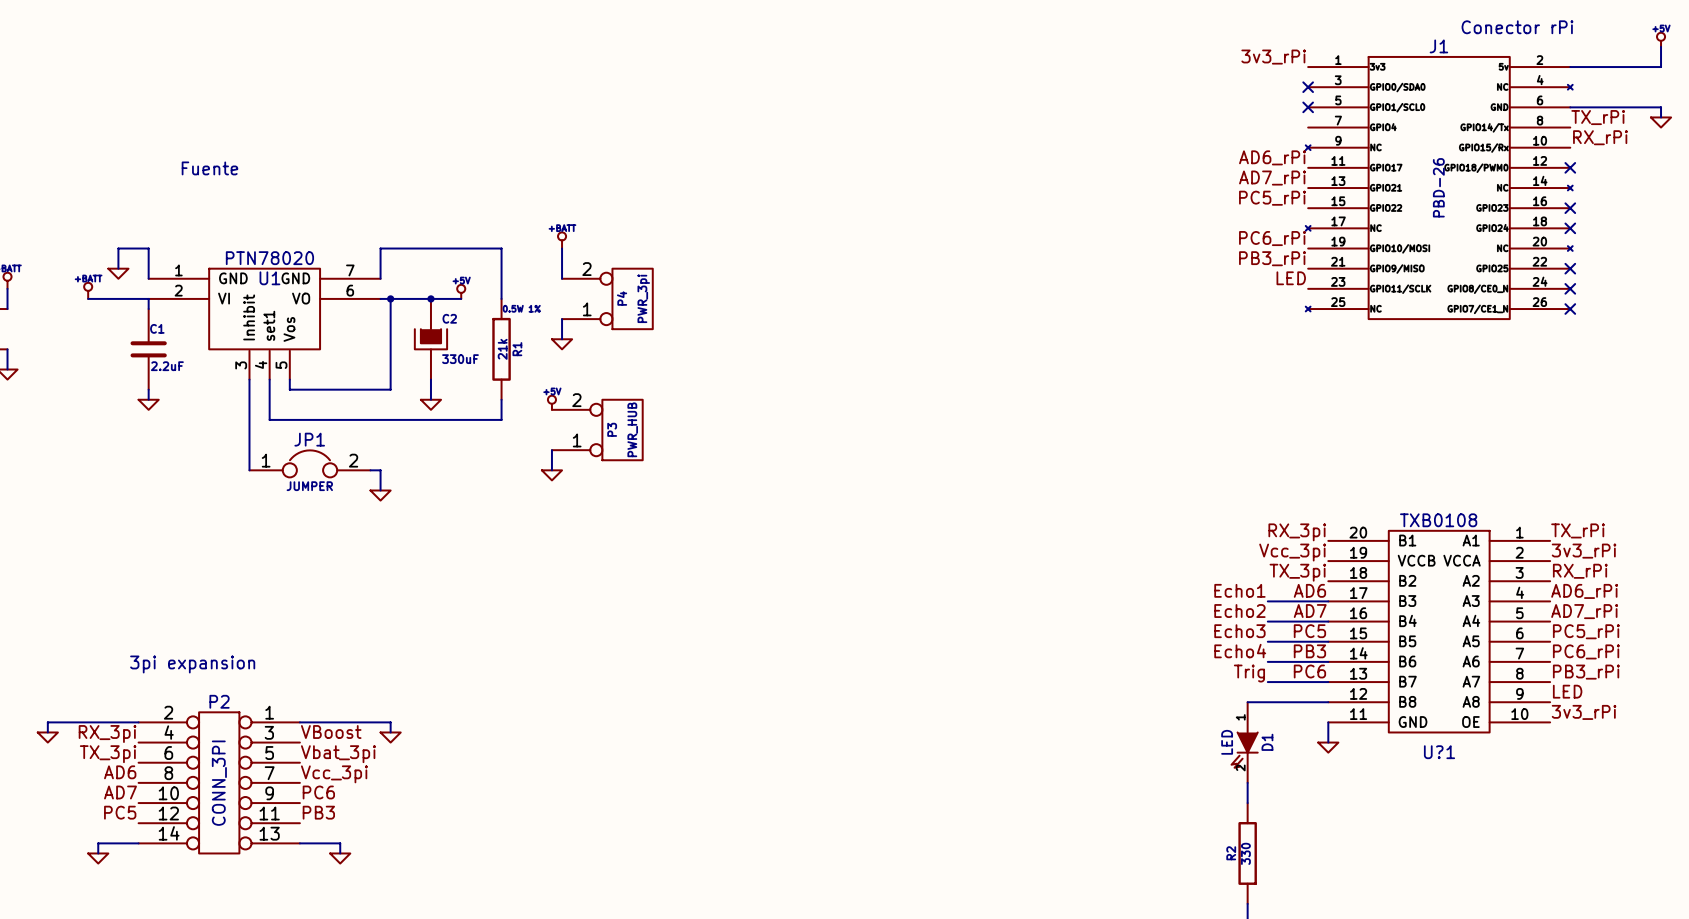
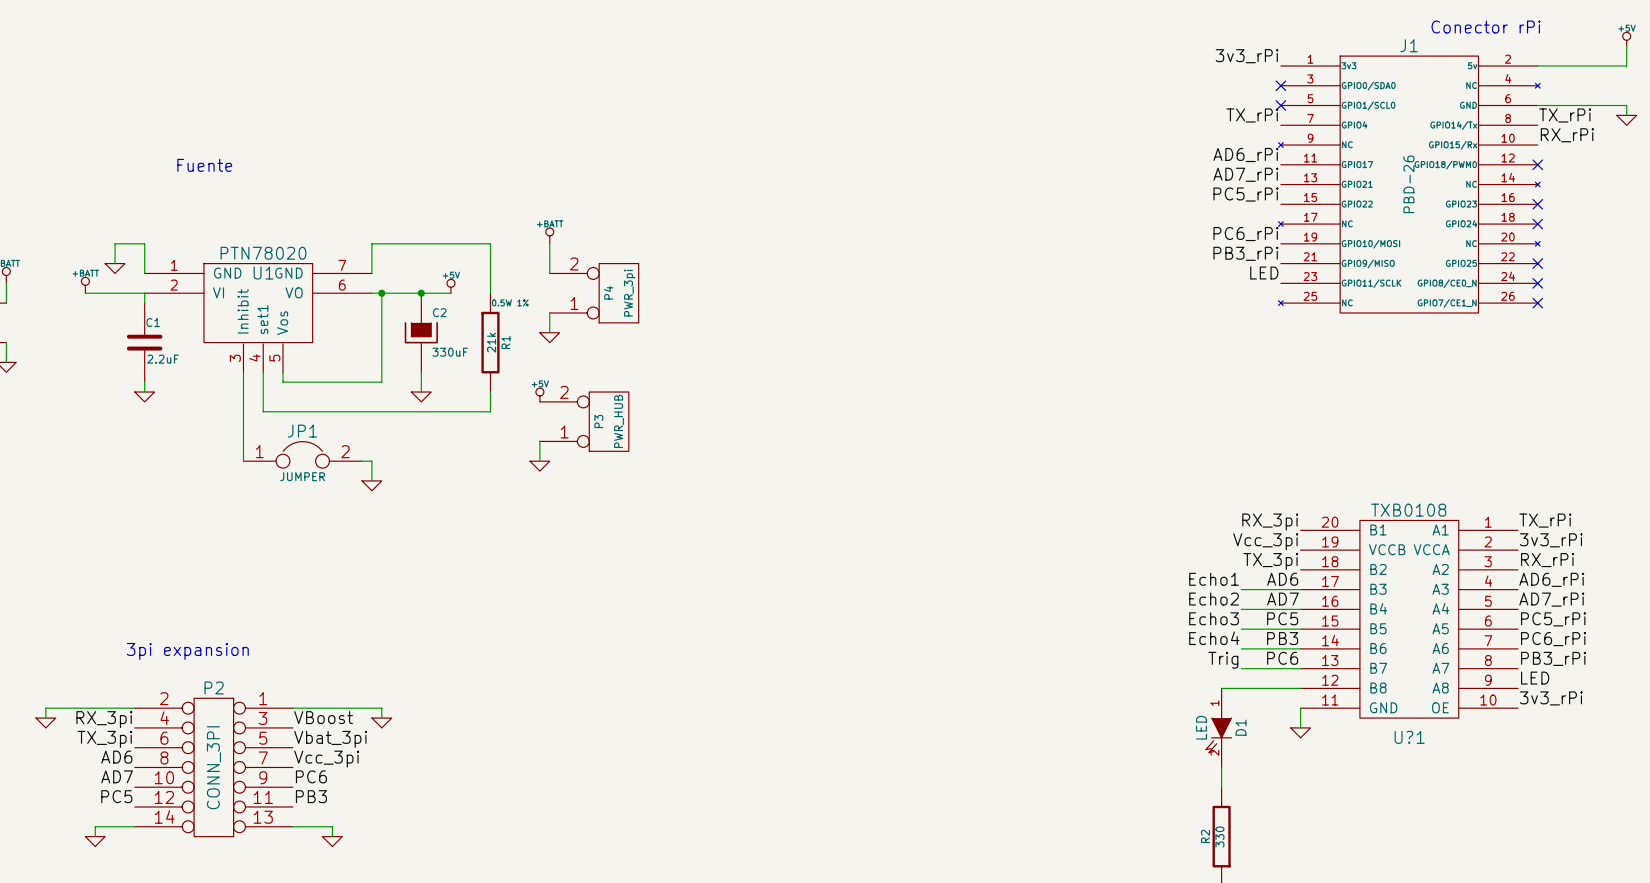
label: none -> TX_rPi (1252, 115)

